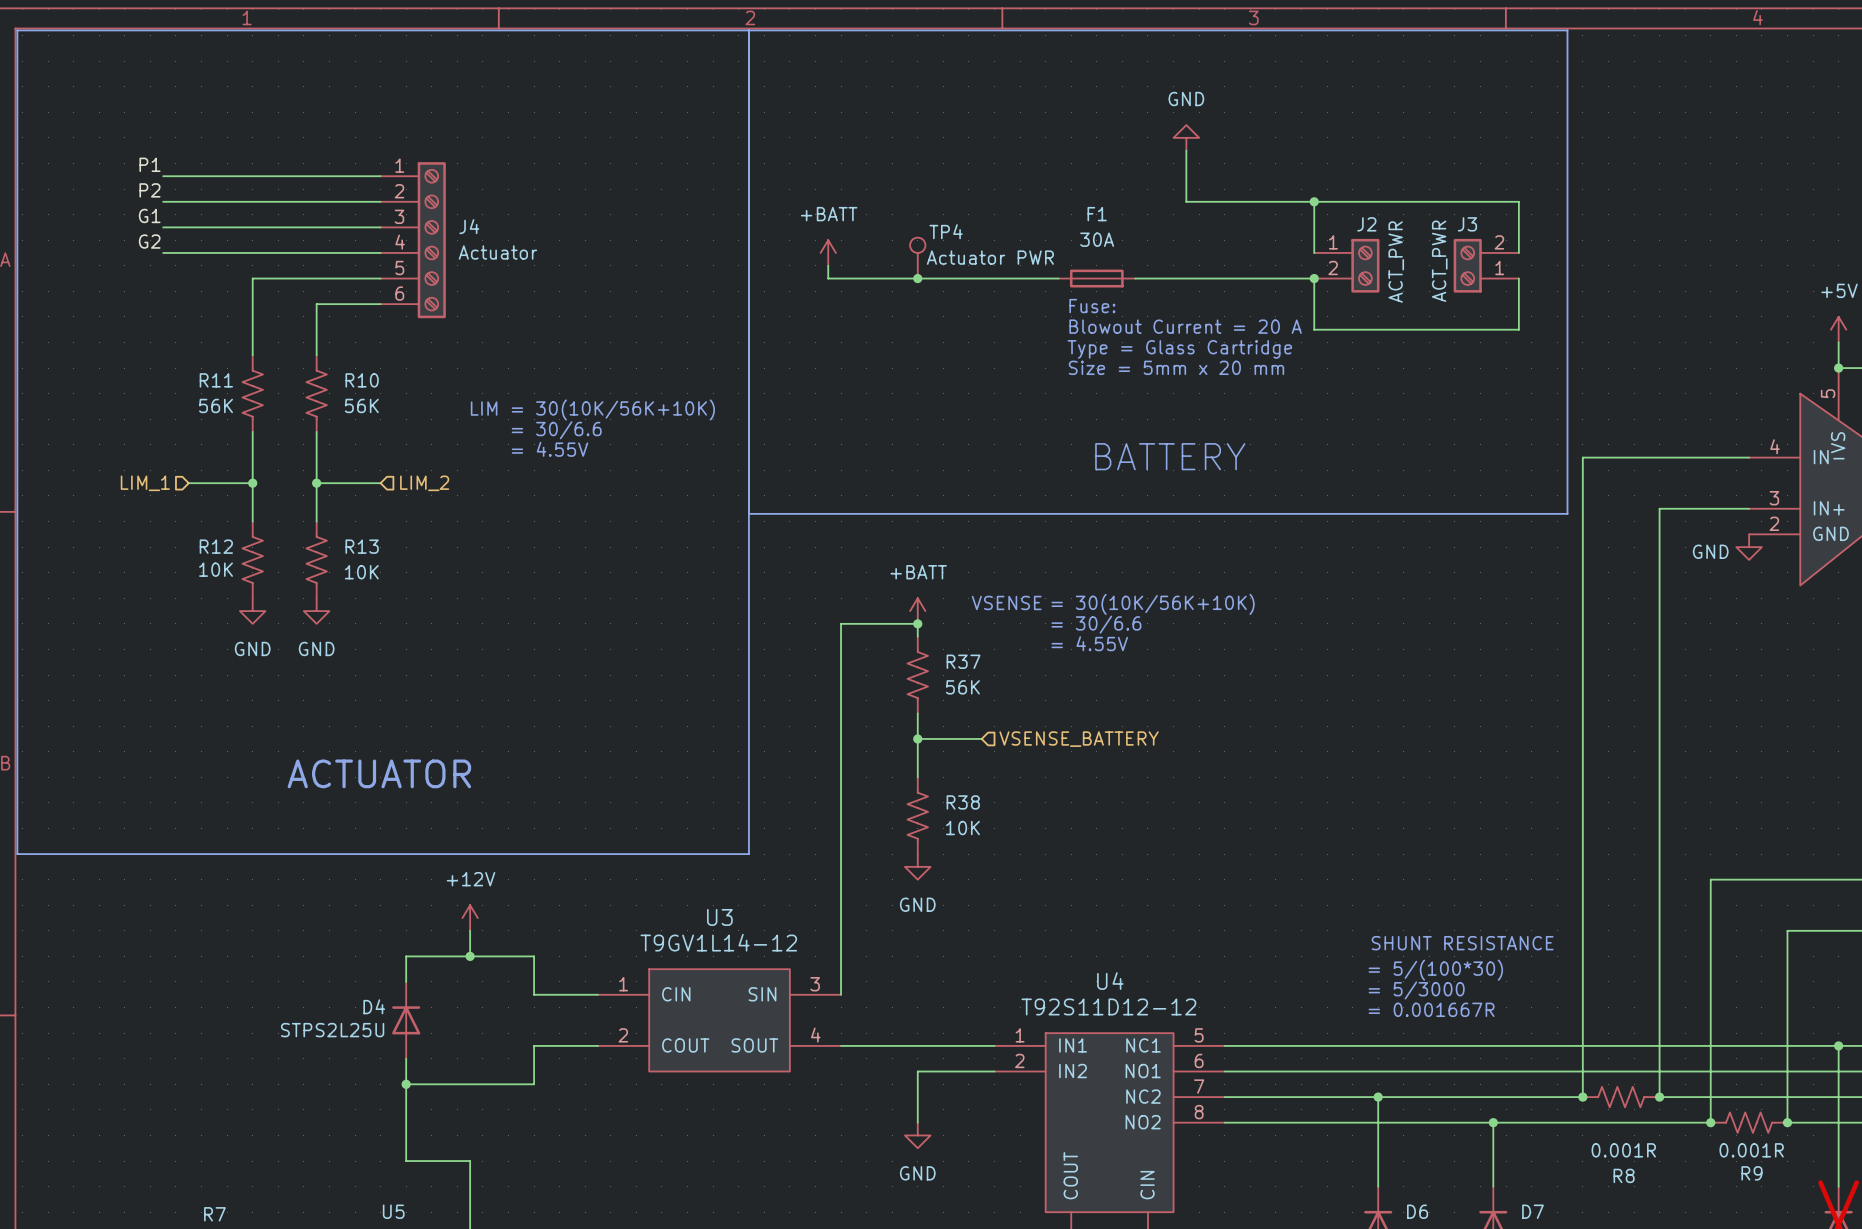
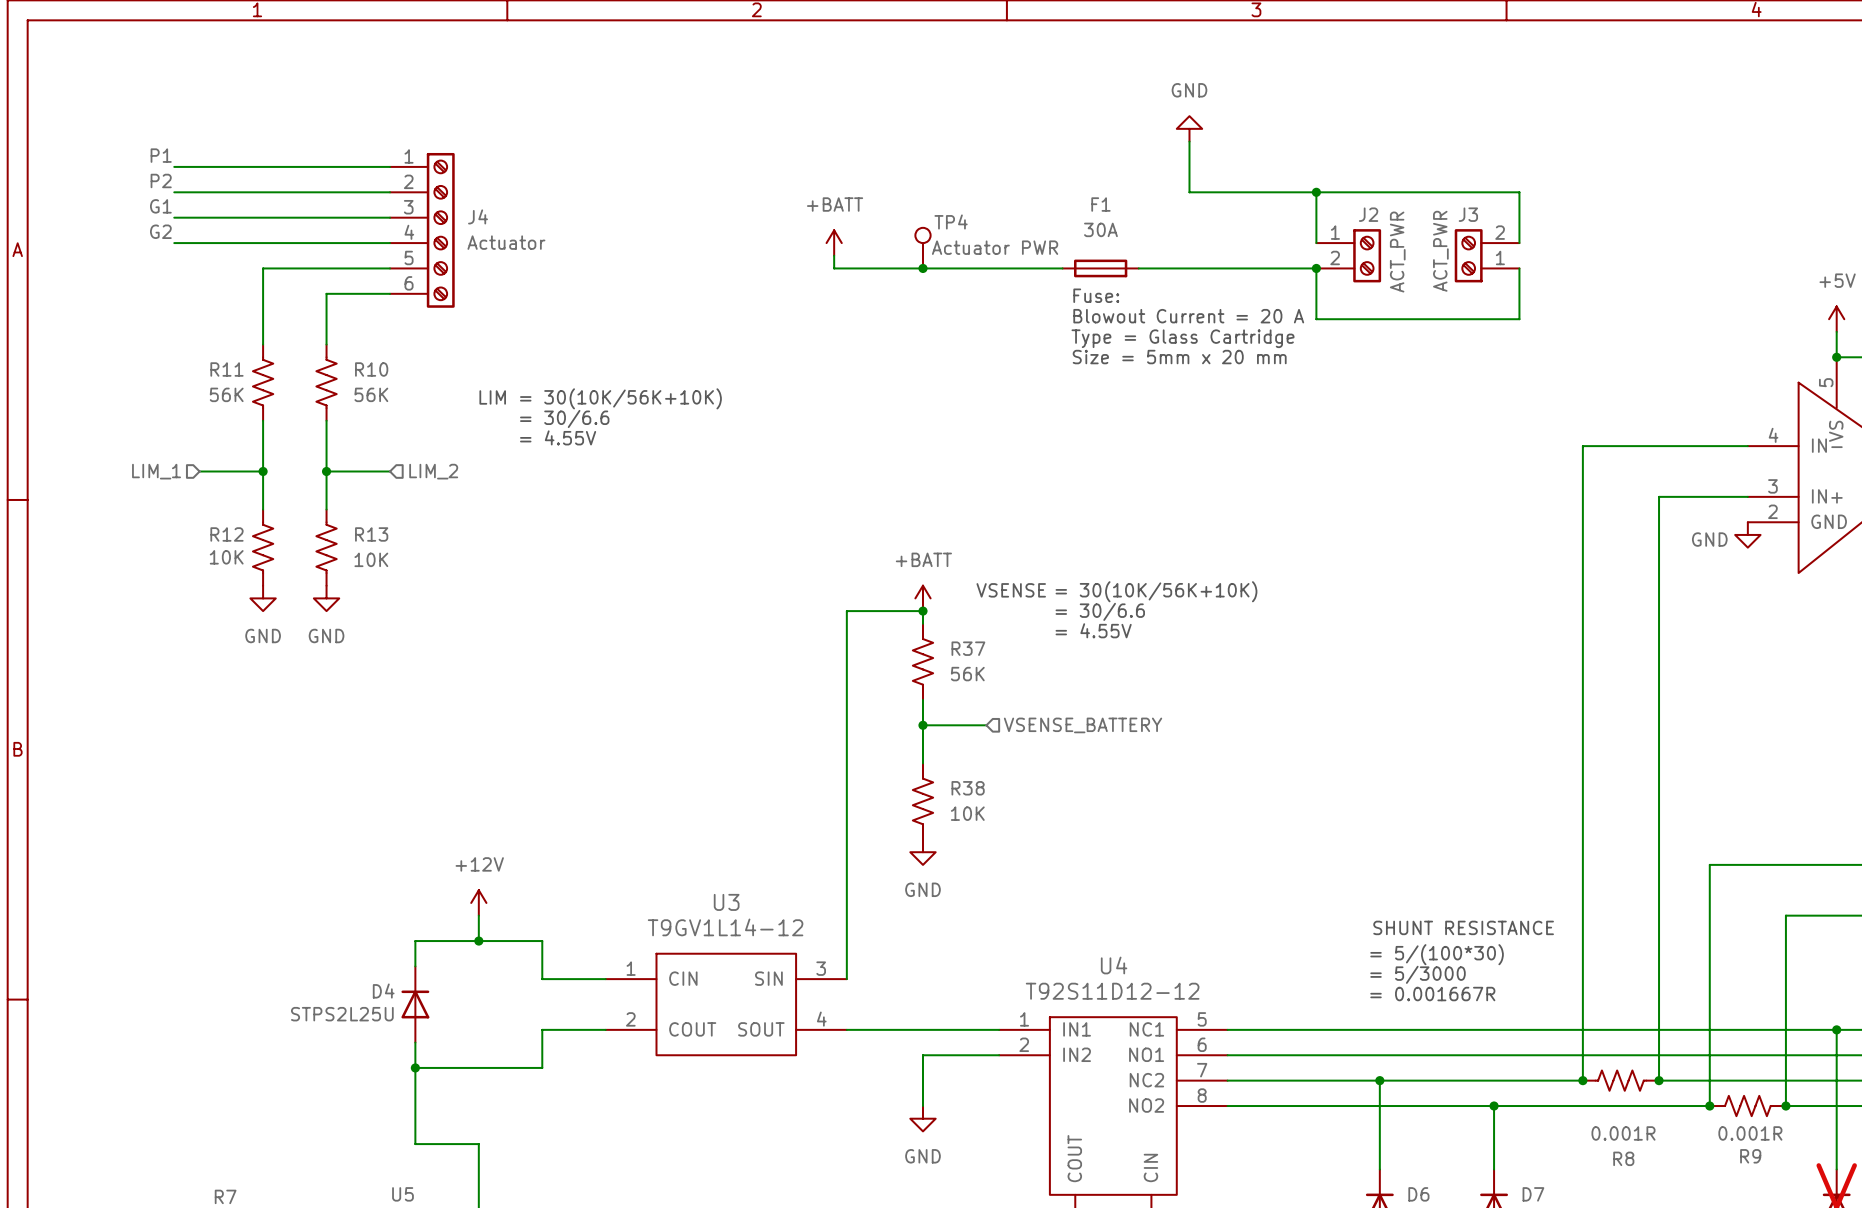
line: (748, 30) (748, 854) (17, 854) (17, 30) (1567, 30) (1567, 513) (748, 513) -> none
text: BATTERY (1170, 456) -> none
text: ACTUATOR (379, 773) -> none

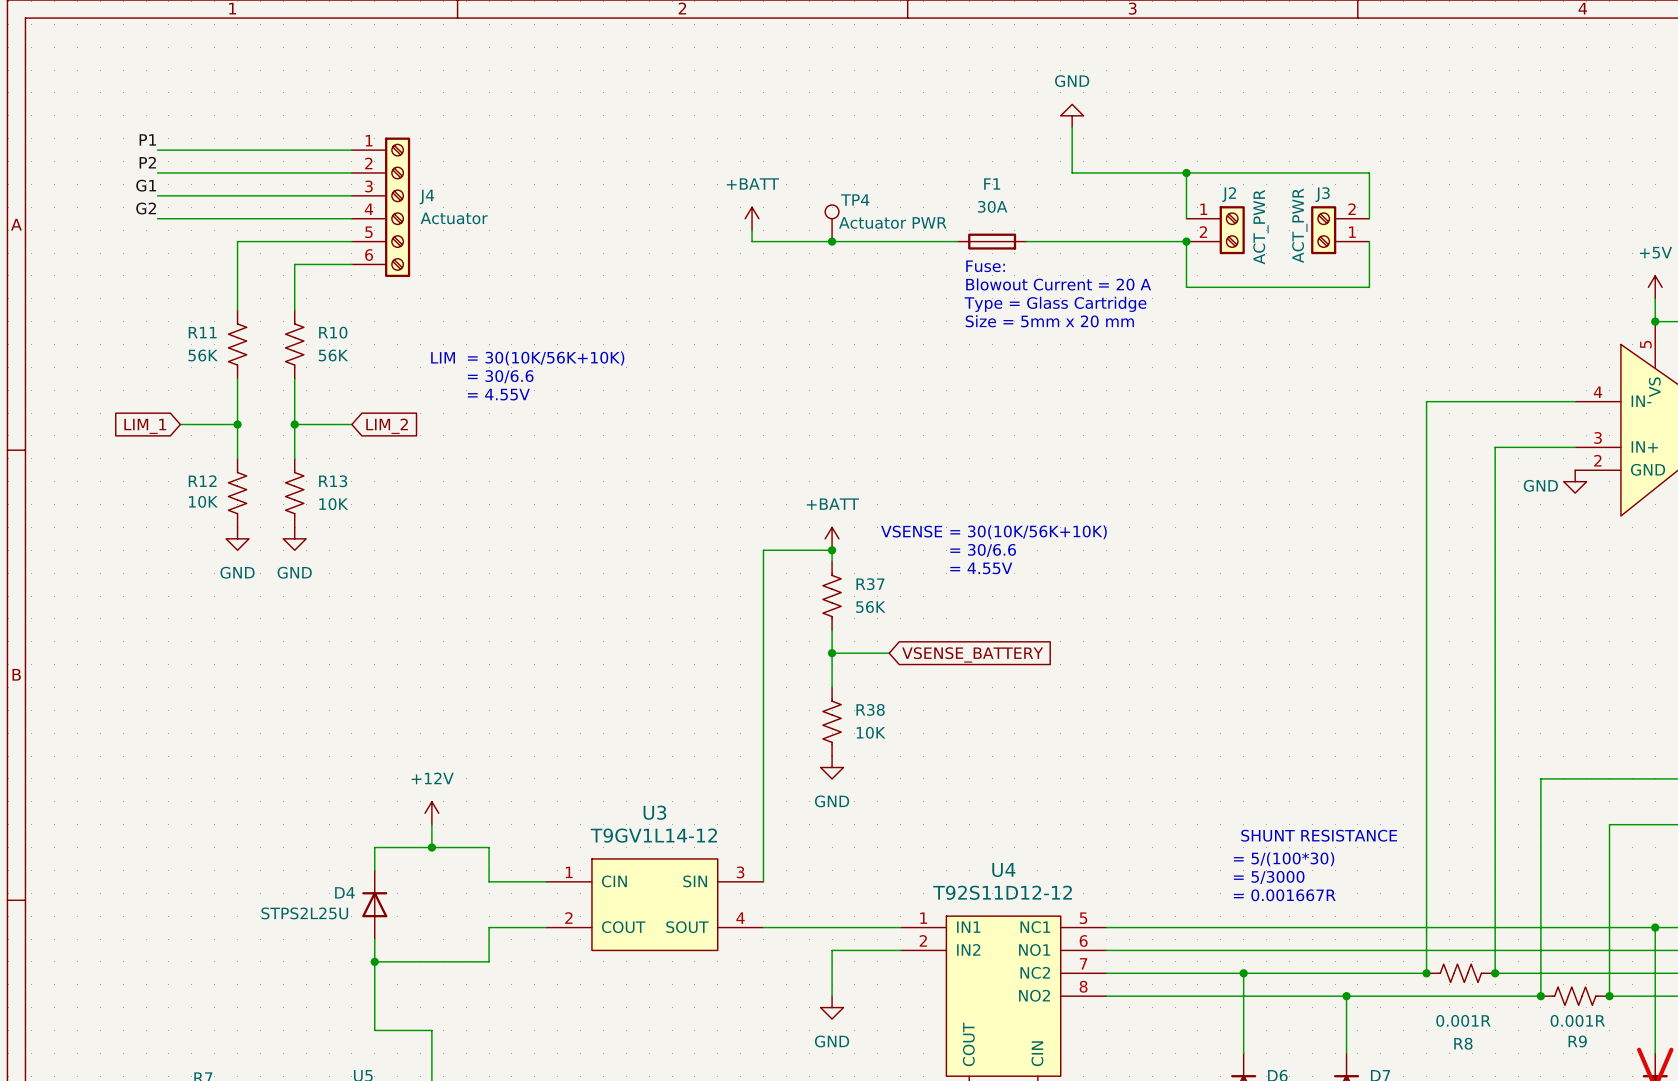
hierarchical label: LIM_1 (156, 471) -> none
hierarchical label: LIM_2 (433, 471) -> none
global label: none -> LIM_1 (145, 426)
global label: none -> LIM_2 (387, 426)
global label: none -> VSENSE_BATTERY (972, 654)
hierarchical label: VSENSE_BATTERY (1083, 725) -> none

